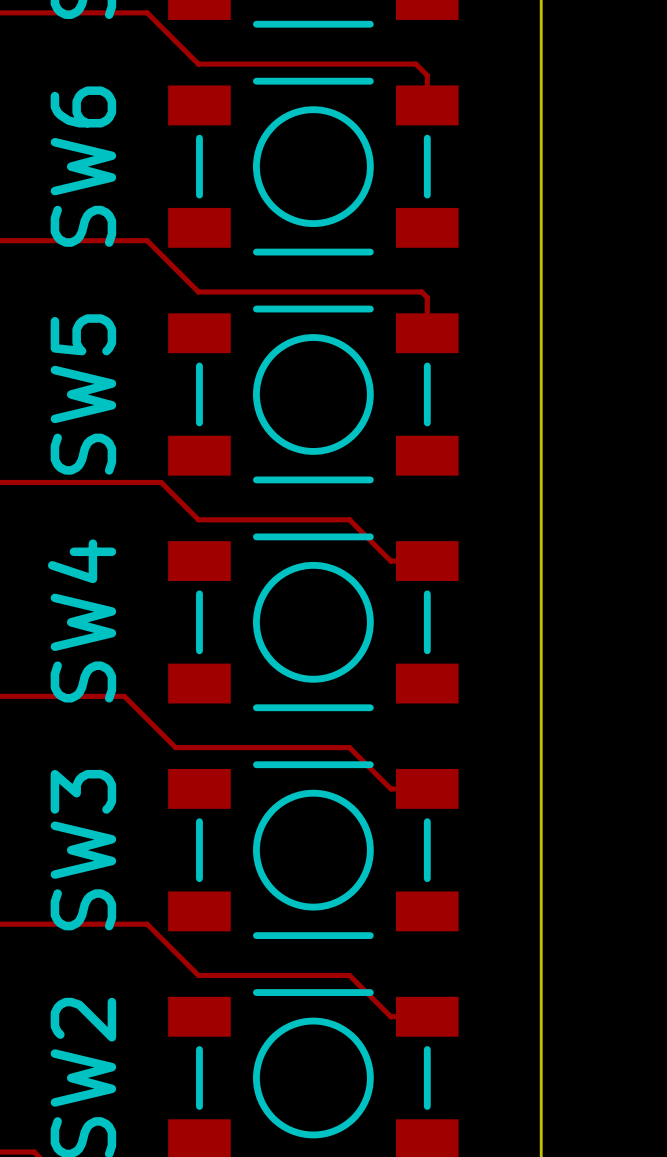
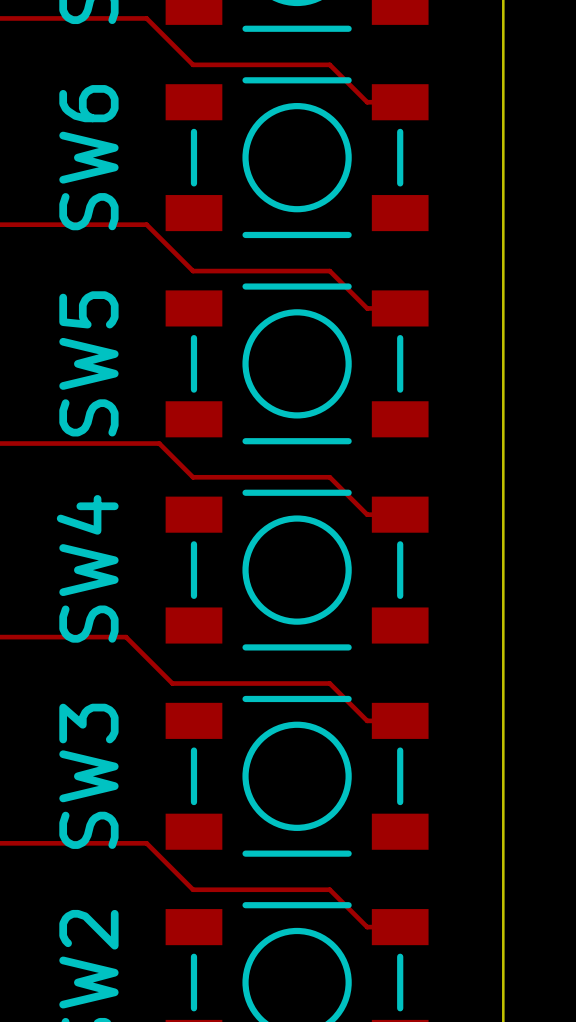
track: (349, 64) (415, 64) (427, 75) (427, 105) -> (329, 64) (367, 102) (400, 102)
track: (349, 291) (421, 291) (427, 297) (427, 333) -> (329, 271) (367, 308) (400, 308)

